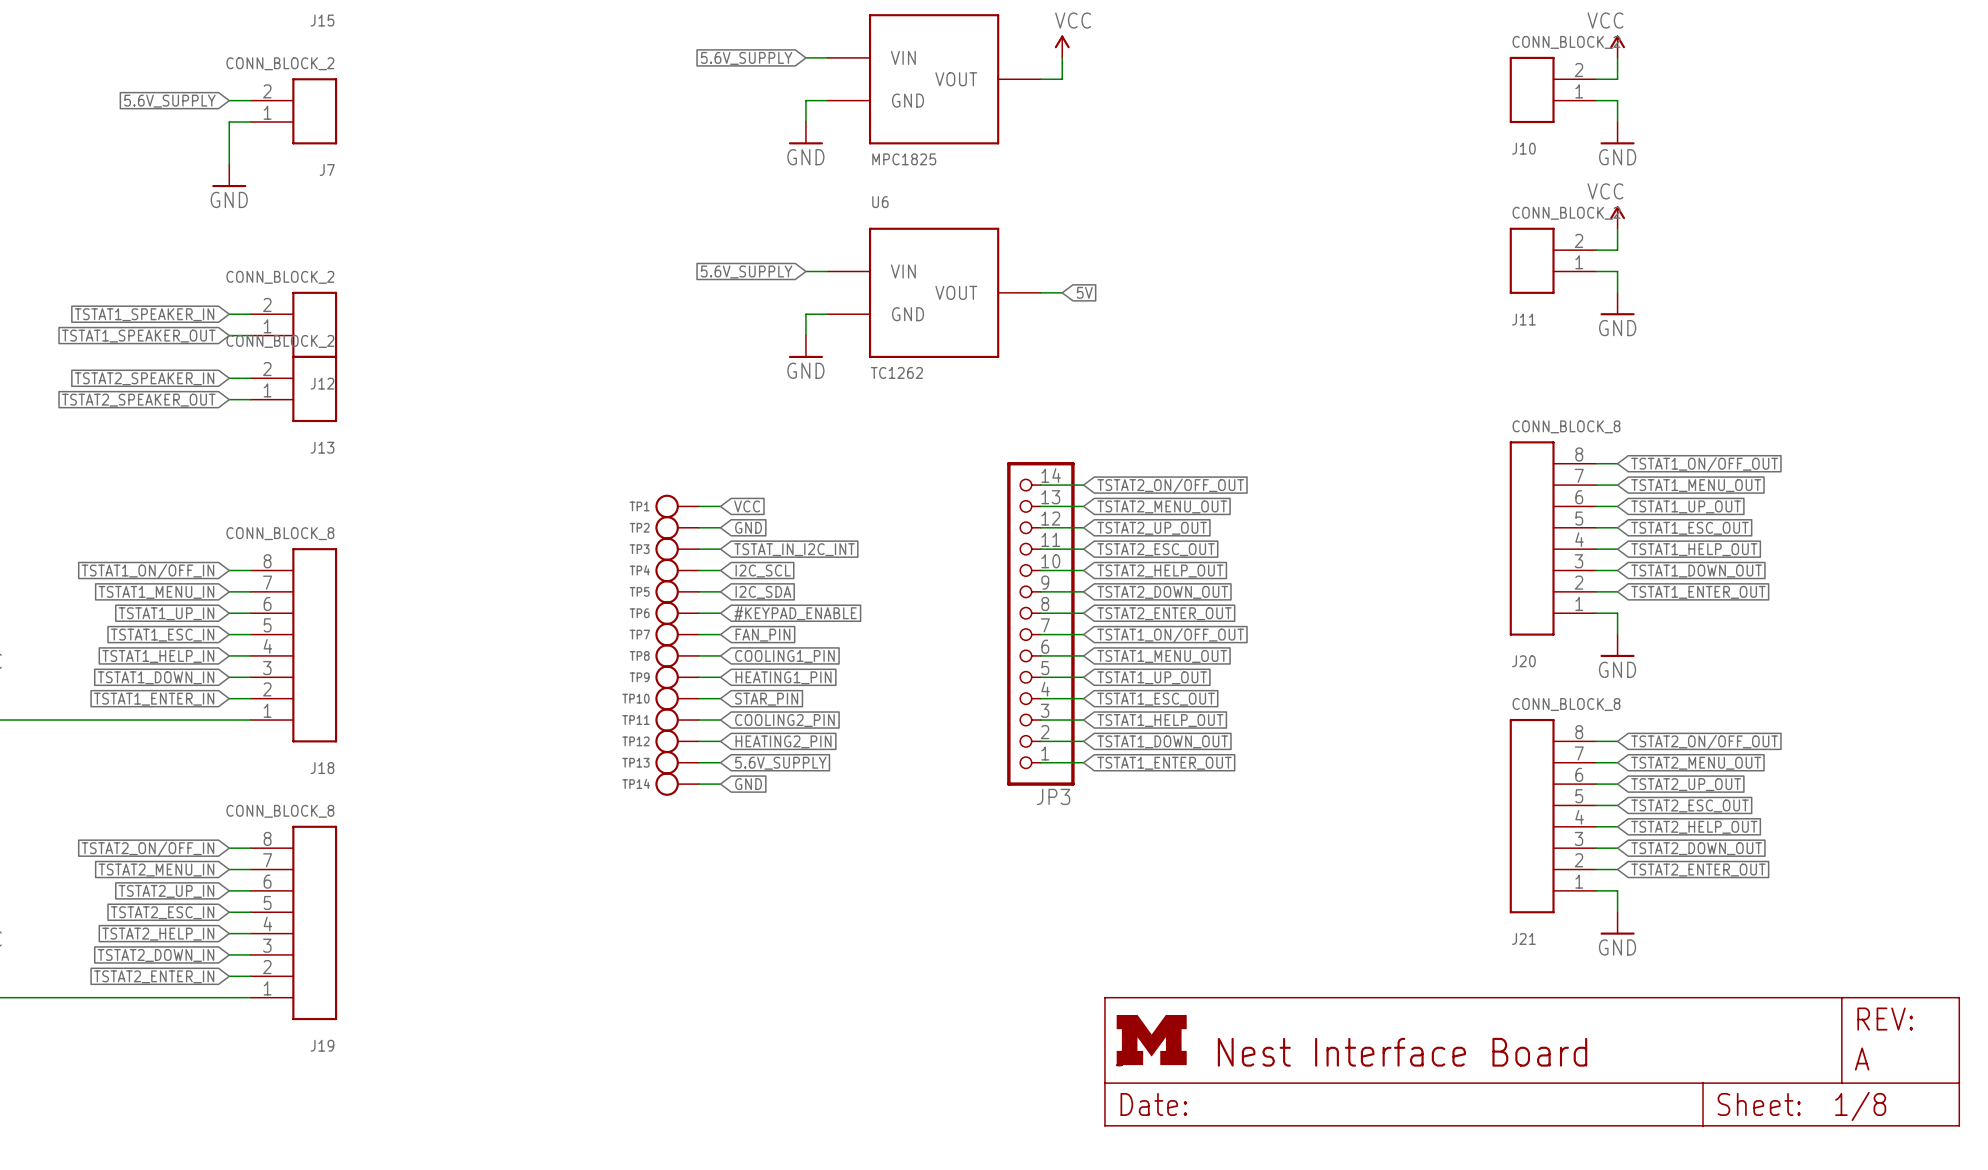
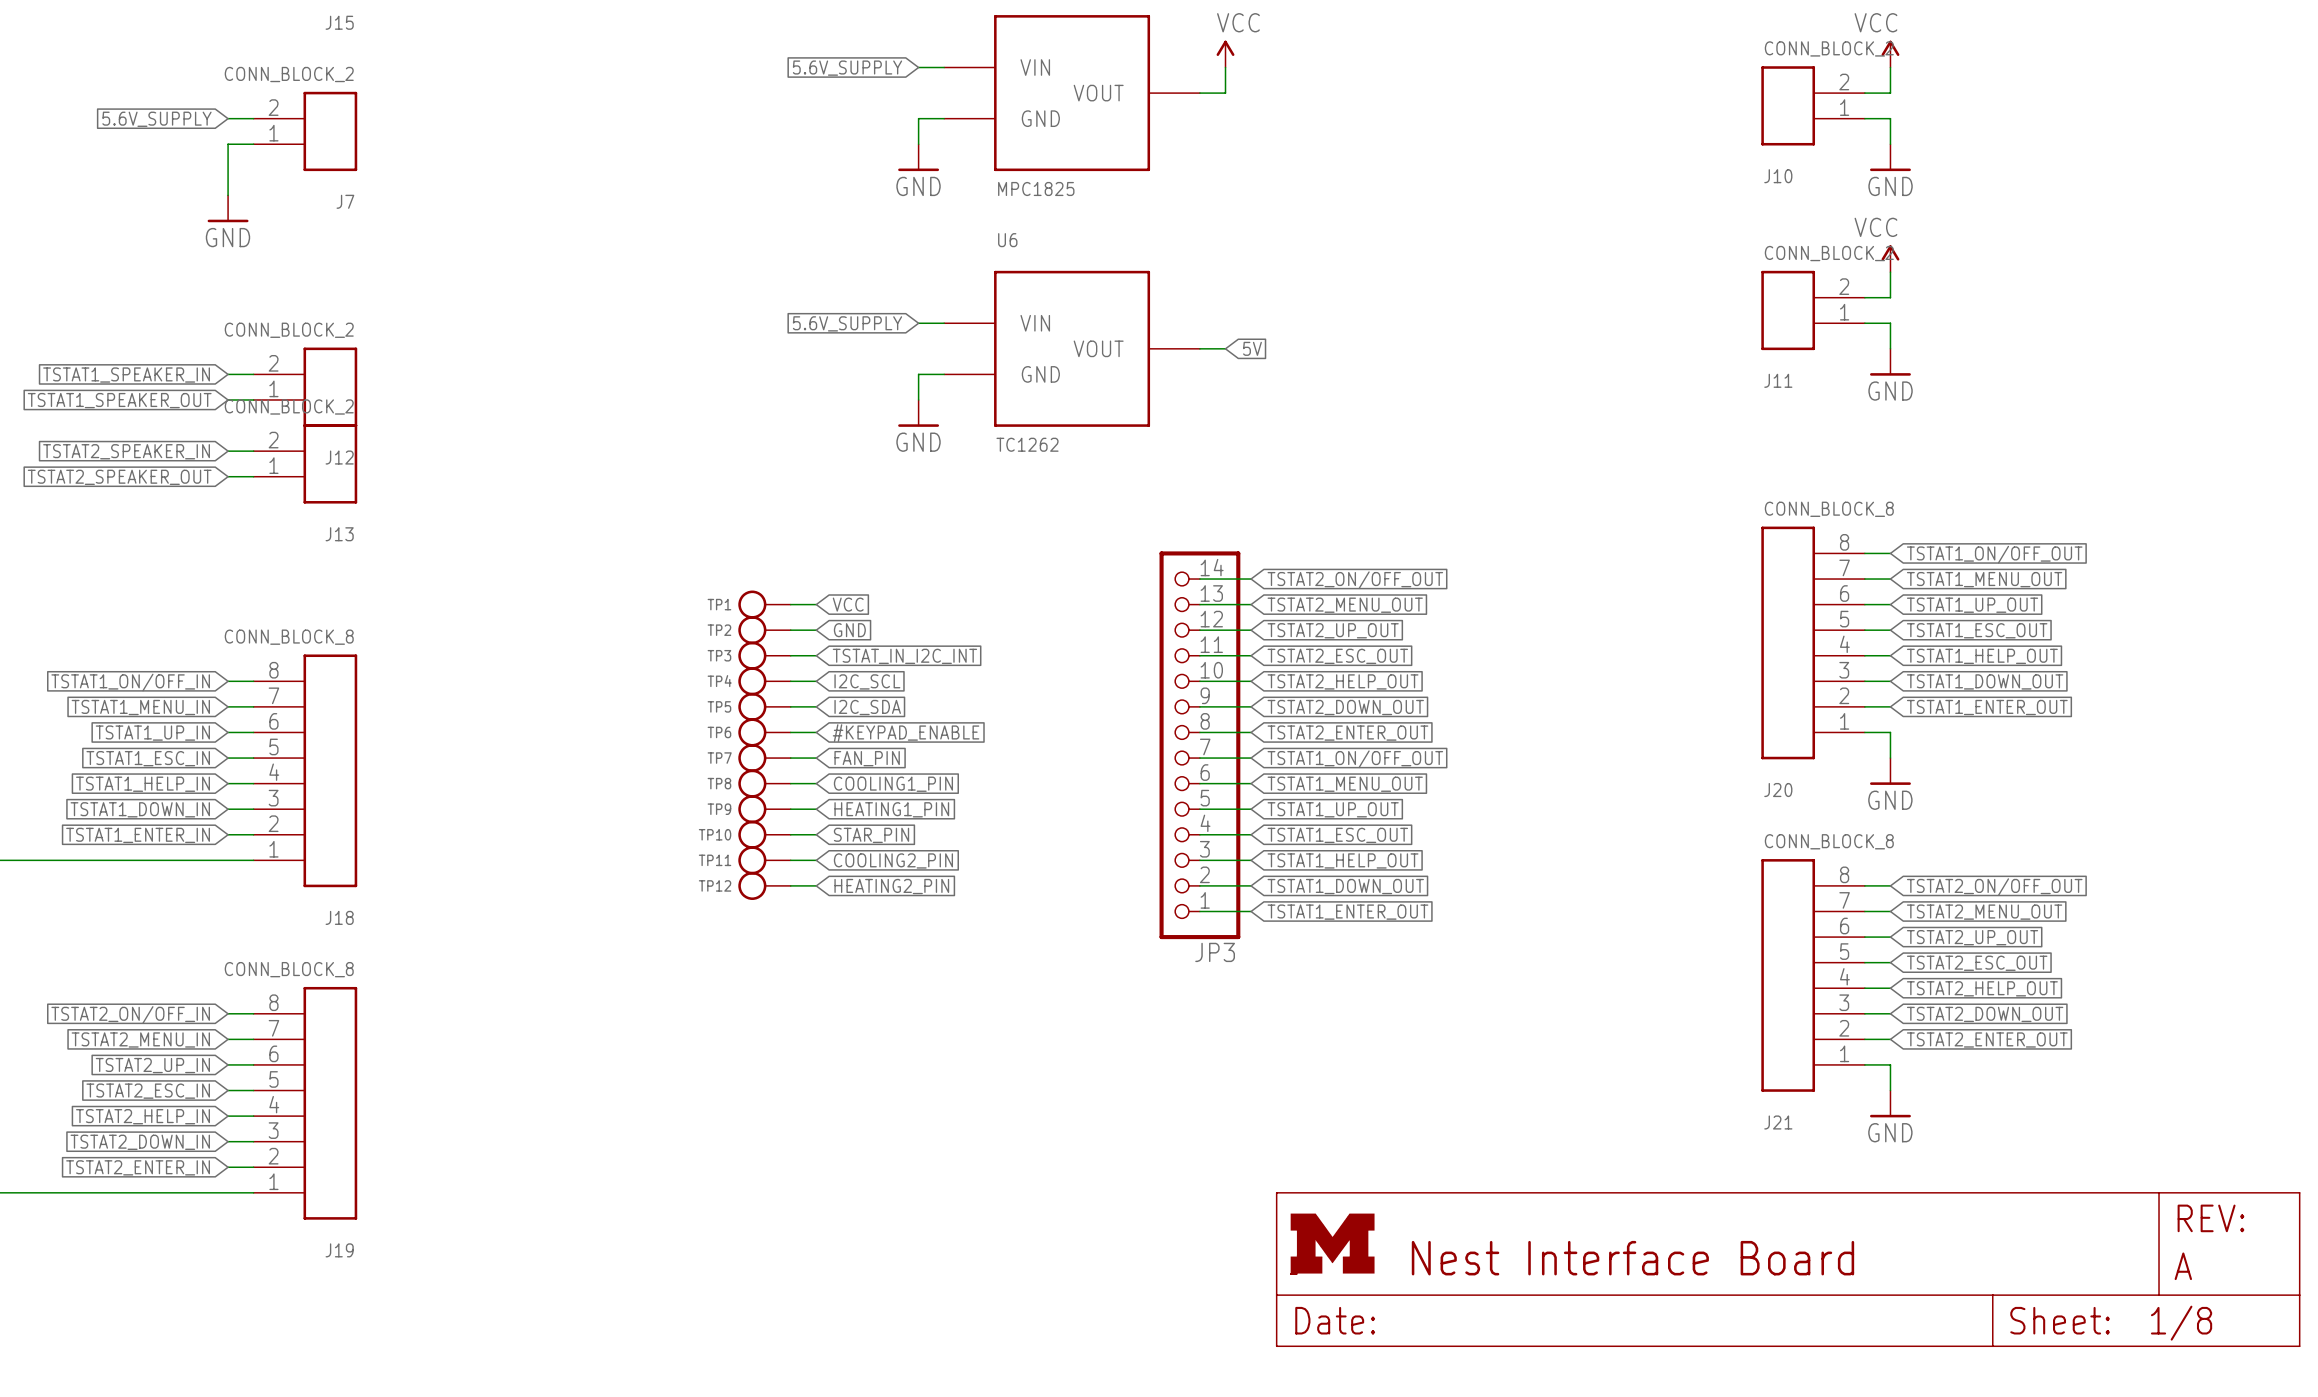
TP13: (677, 762) -> none
wire: (699, 762) (720, 762) -> none
global label: 5.6V_SUPPLY (780, 763) -> none
TP14: (677, 784) -> none
wire: (699, 784) (720, 784) -> none
global label: GND (748, 784) -> none

